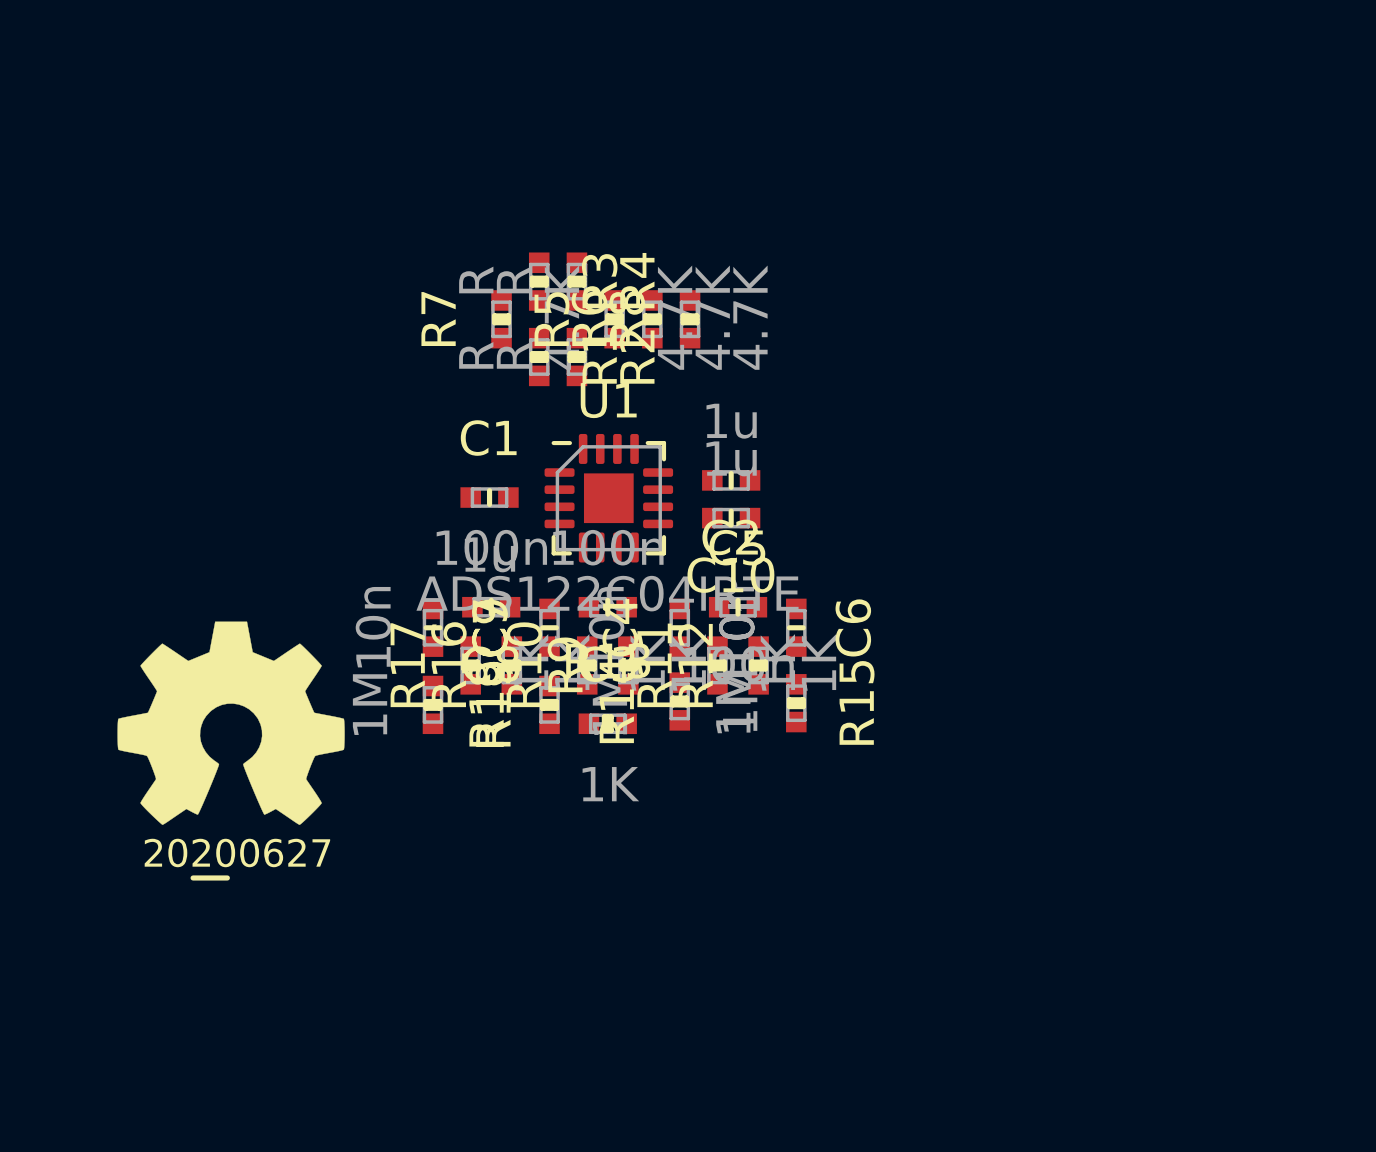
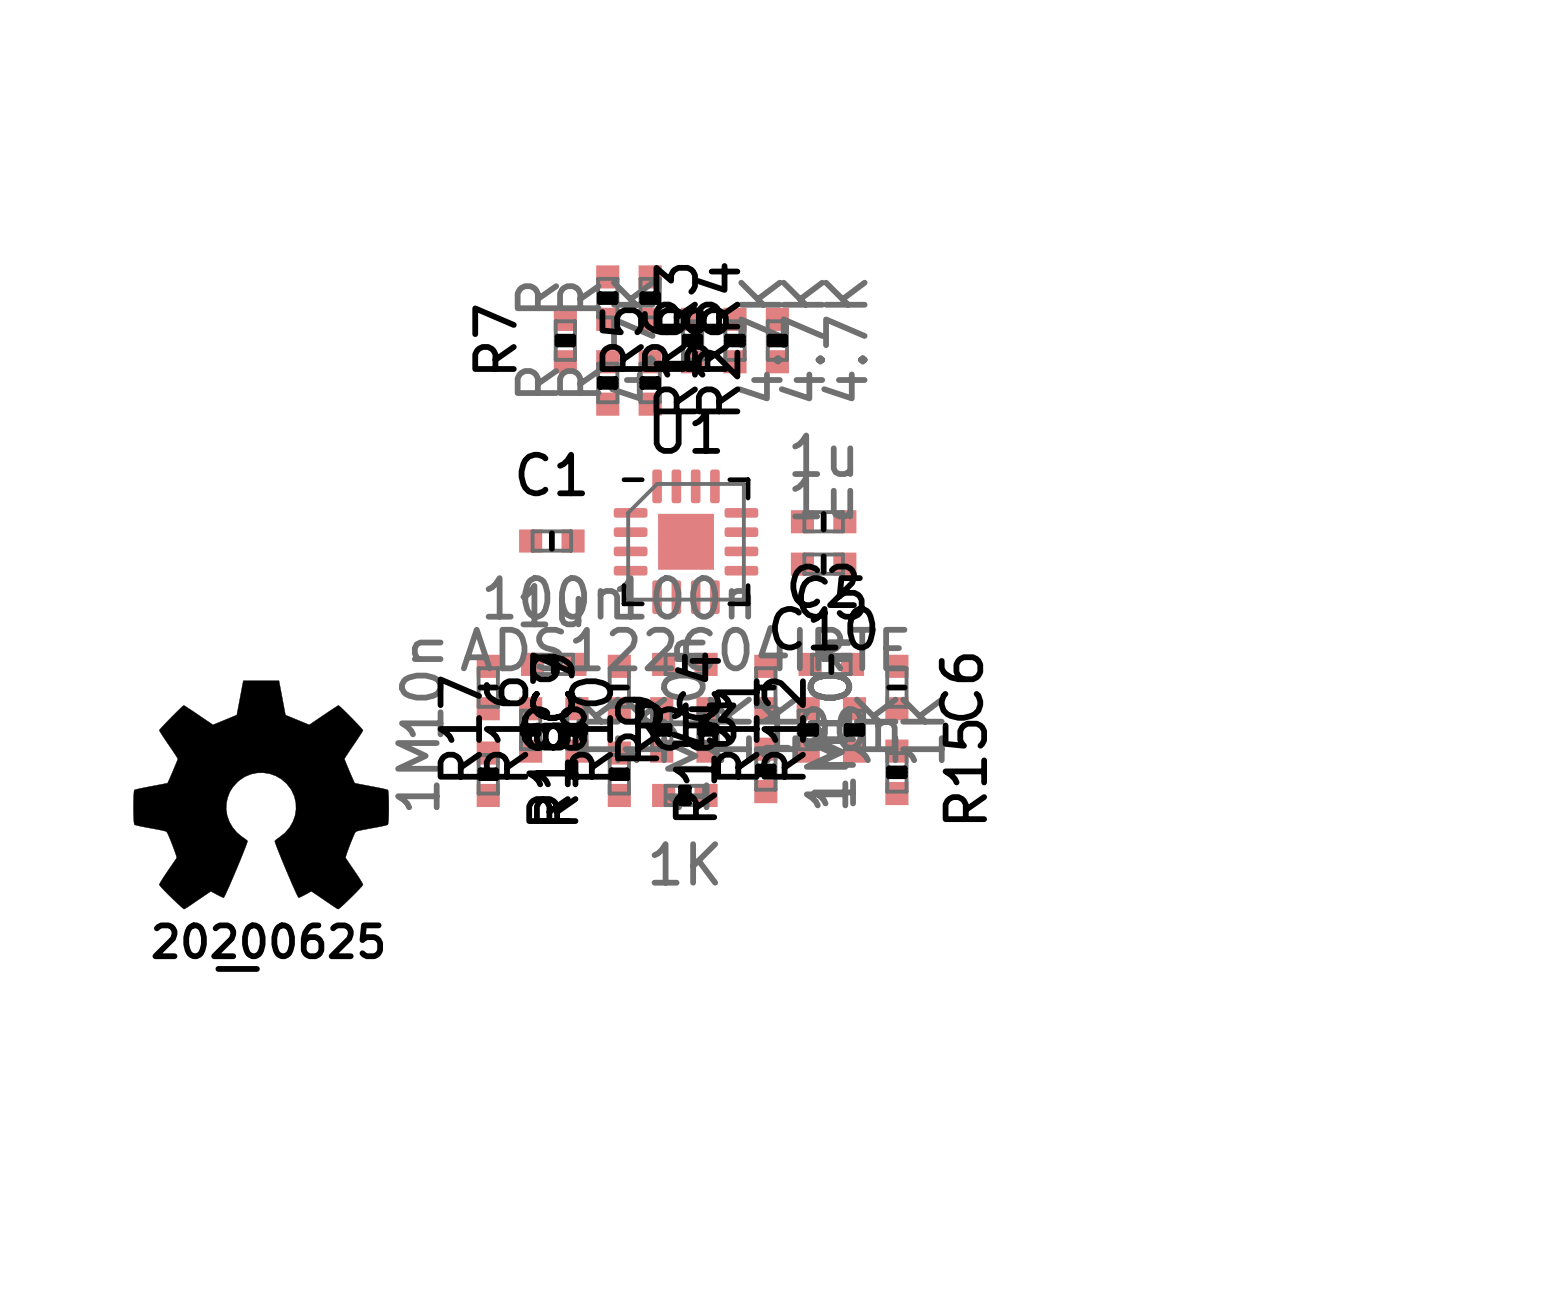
drawing shape: [144, 838, 331, 881] -> [152, 922, 384, 972]

